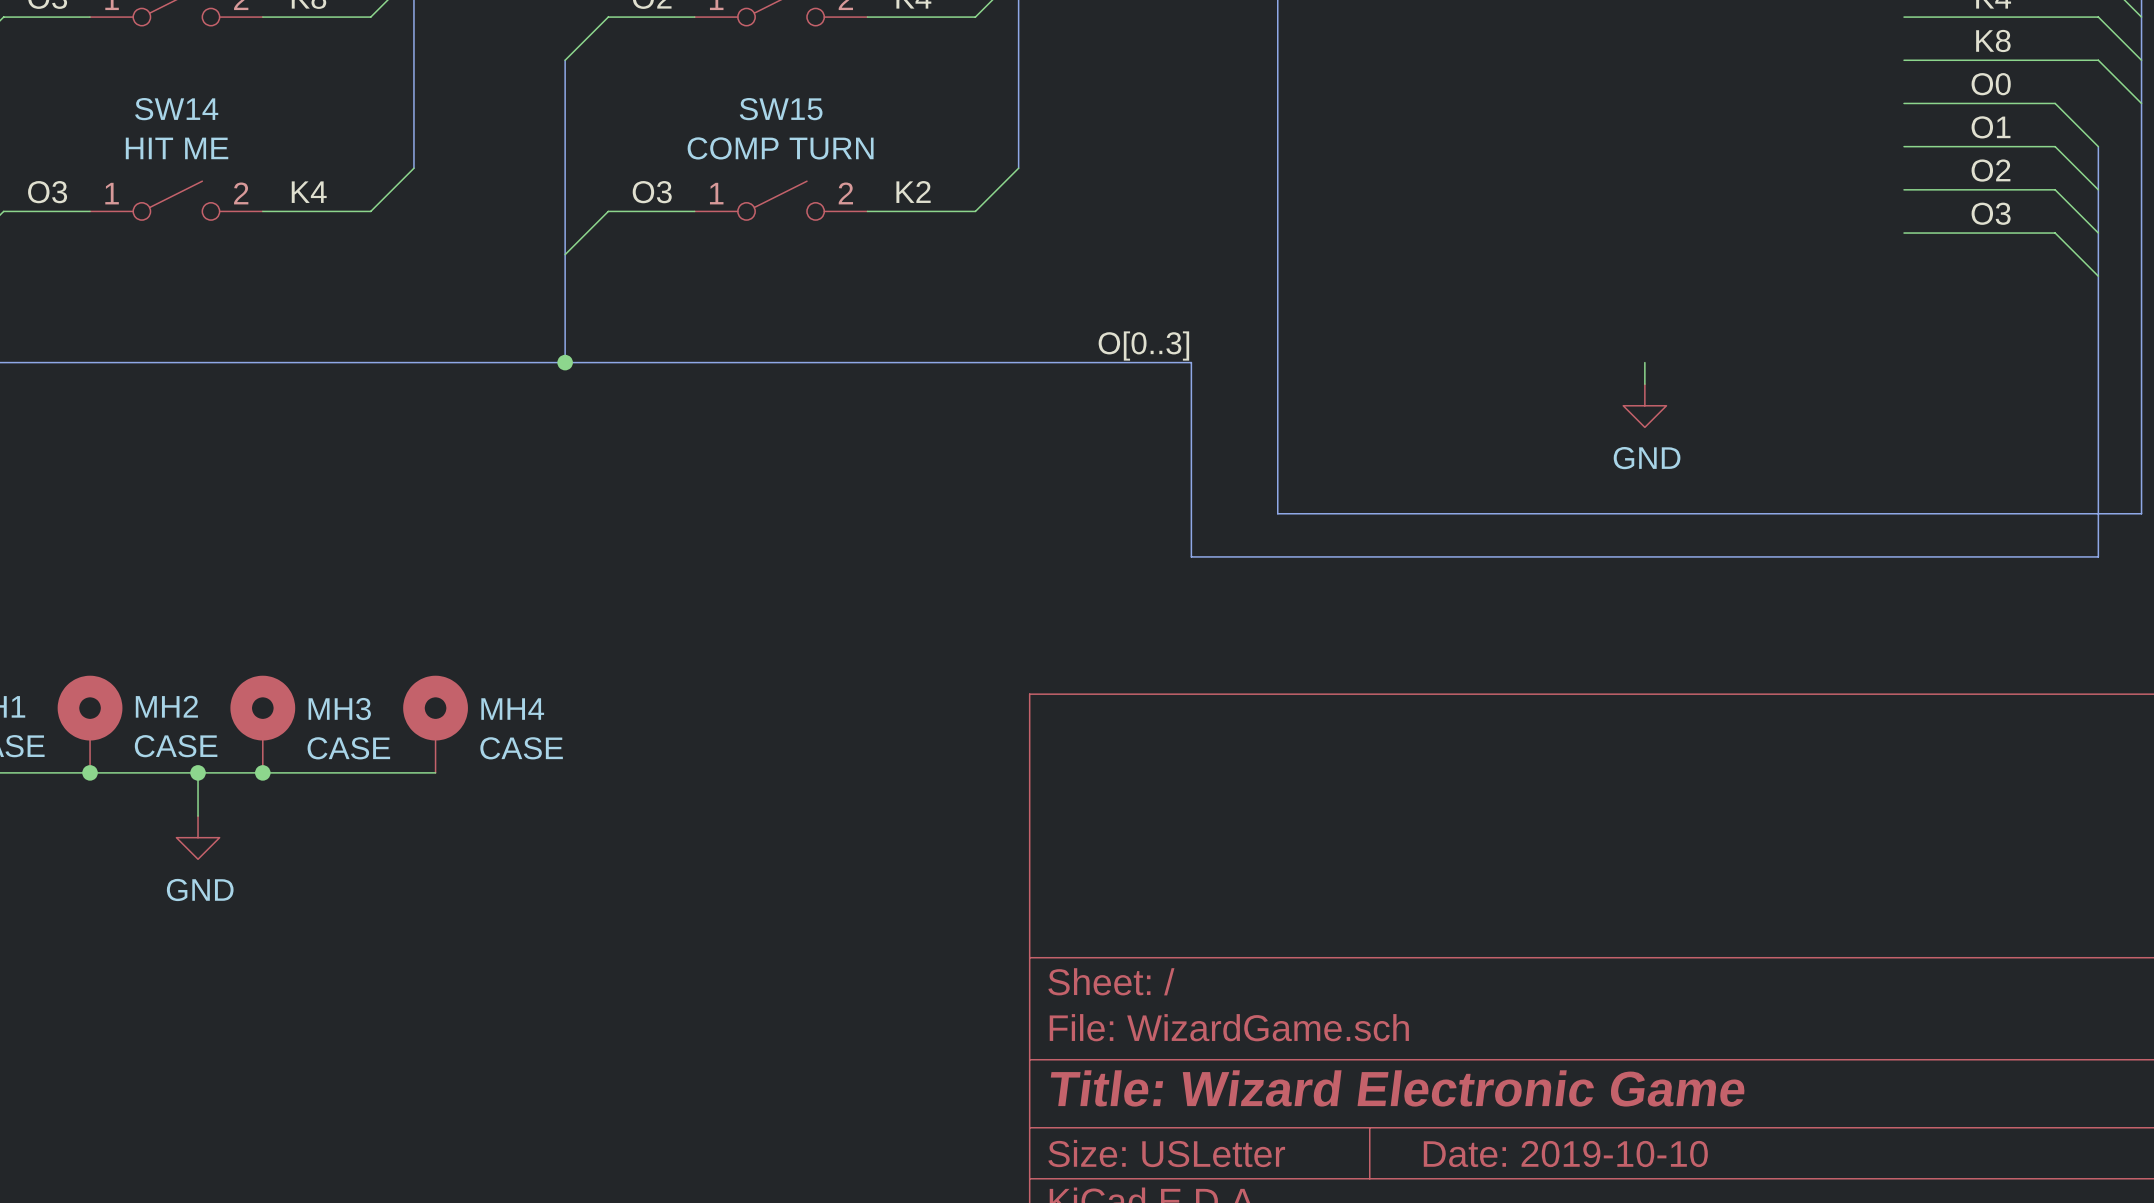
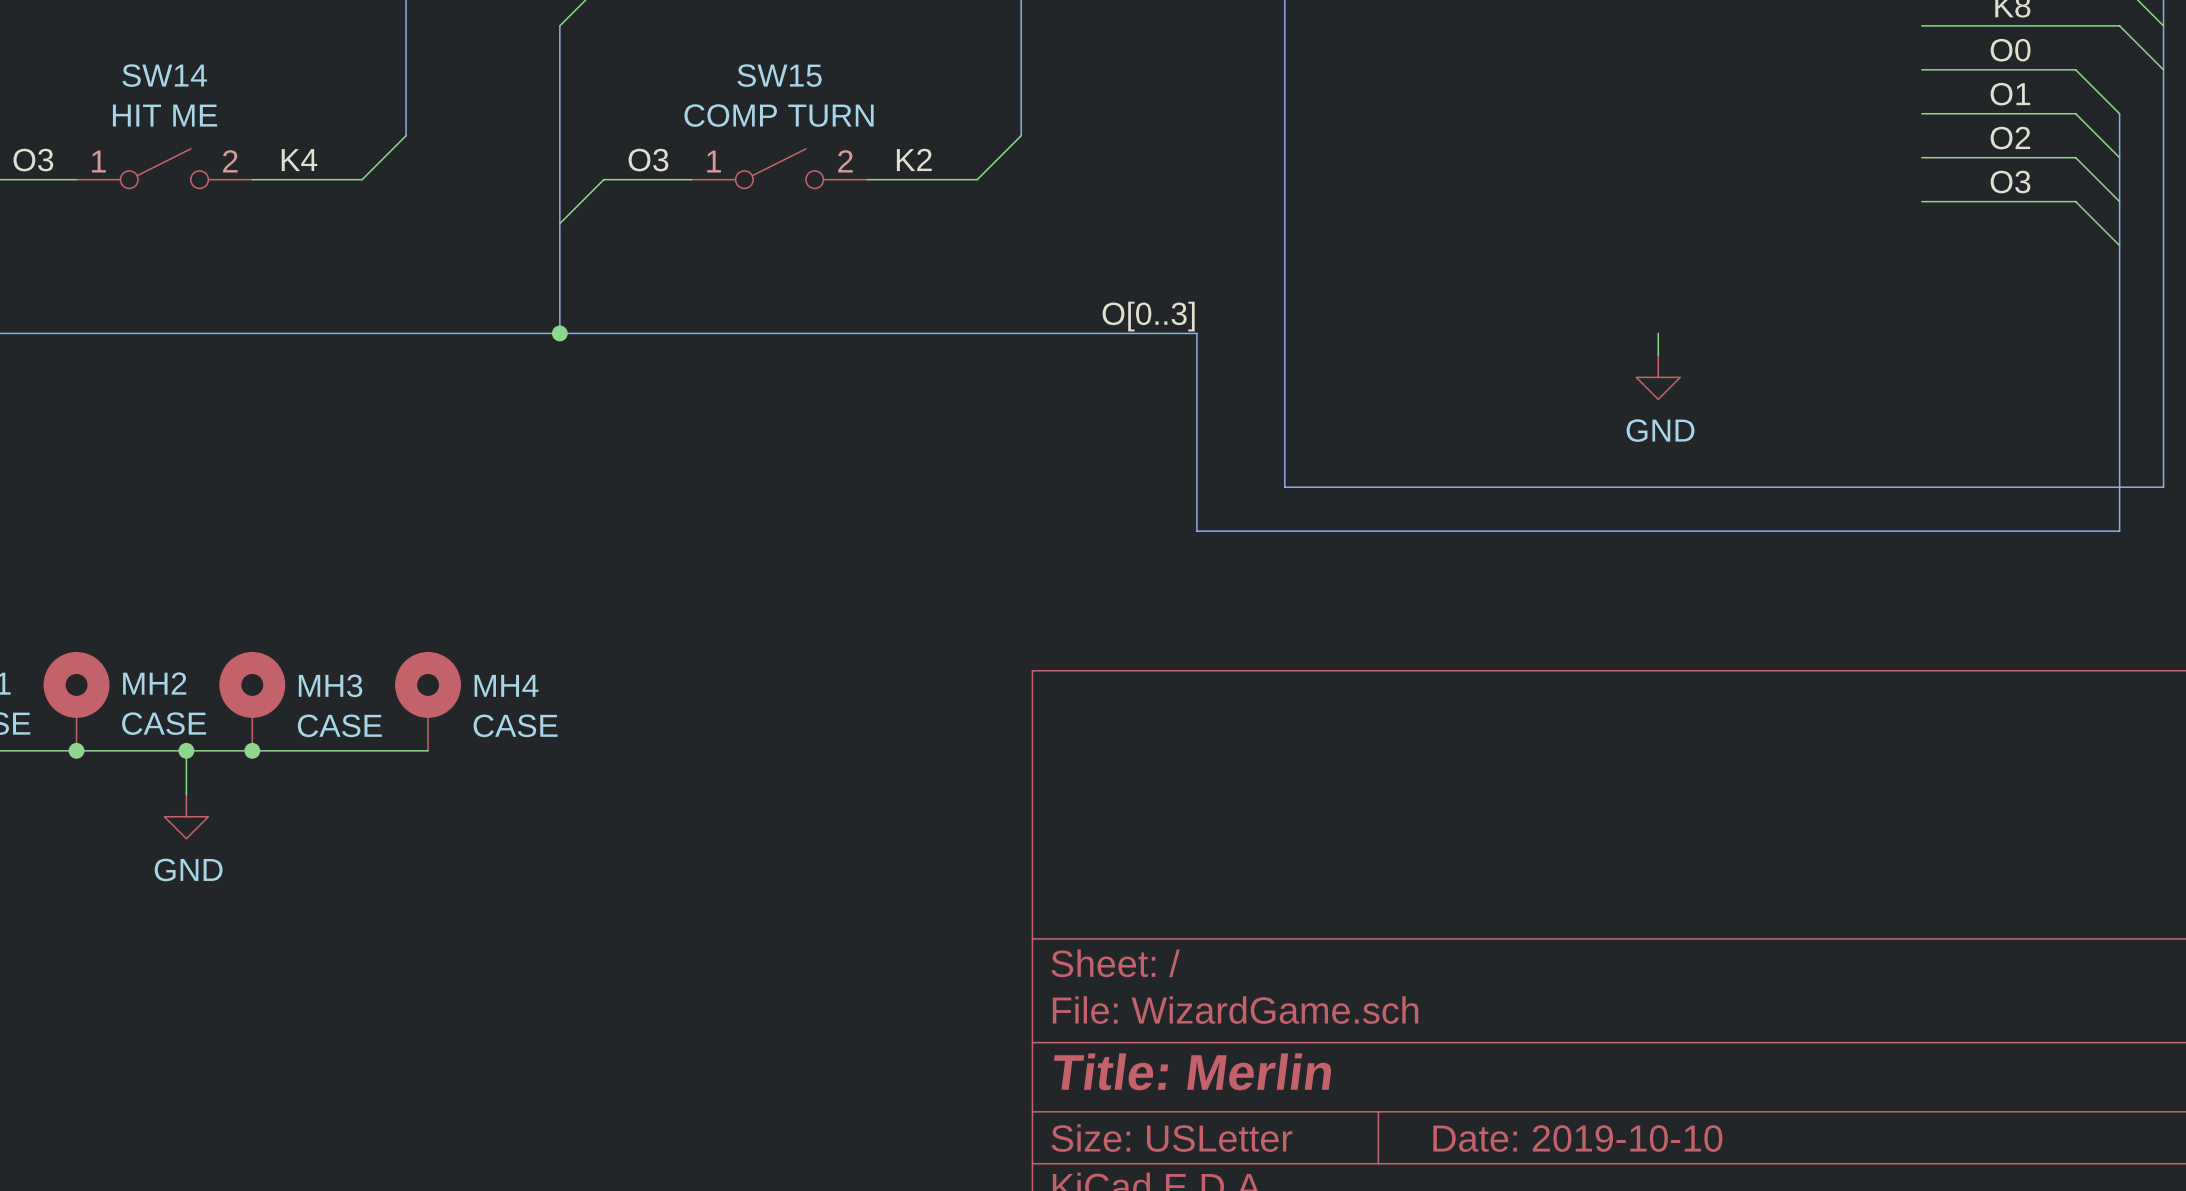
title block: Title: Wizard Electronic Game (1397, 1088) -> Title: Merlin (1192, 1071)

